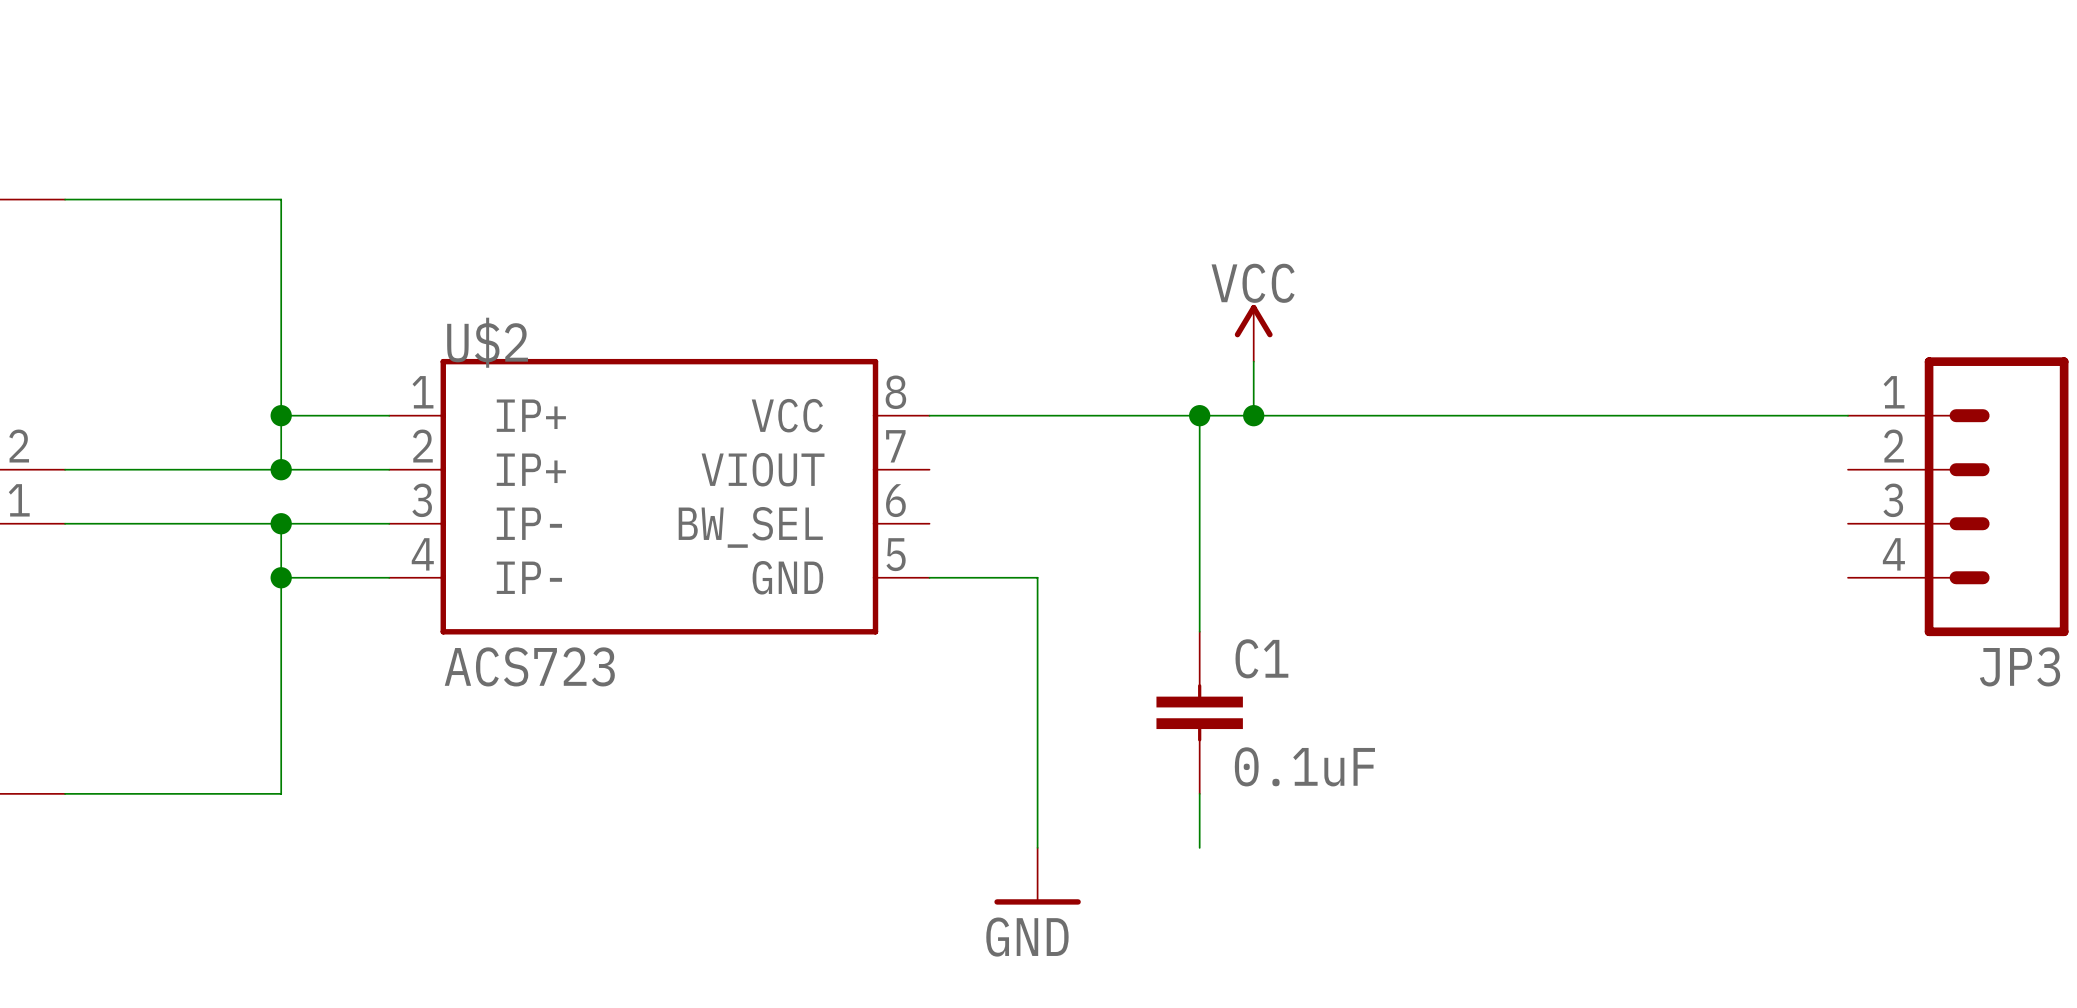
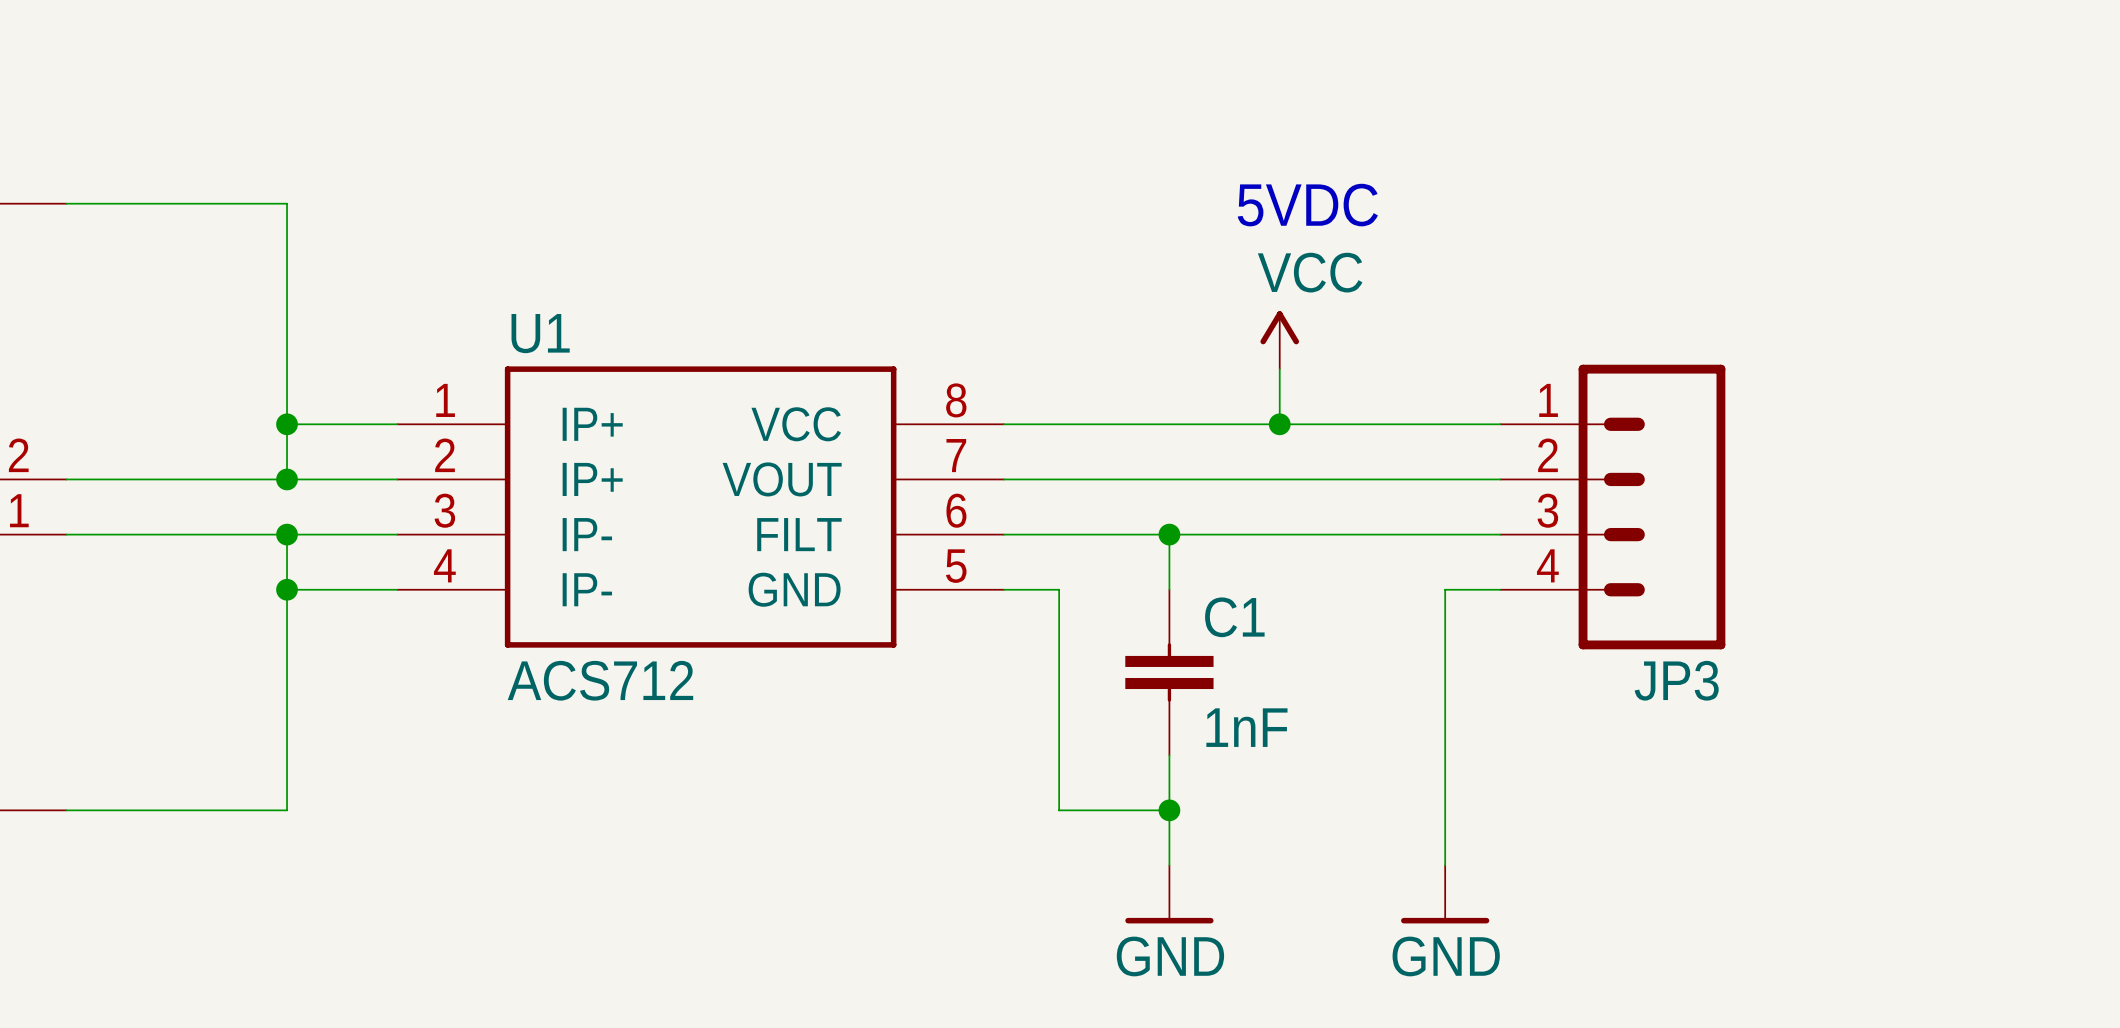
text: none -> 5VDC (1307, 205)
power symbol text position: VCC (1253, 283) -> VCC (1310, 272)
wire: (1199, 415) (1199, 631) -> none
junction position: (1199, 415) -> (1169, 534)
wire: (1469, 415) (1848, 415) -> none
wire: none -> (1003, 479) (1500, 479)
U$2: ACS723 (659, 496) -> none
U1: none -> ACS712 (700, 507)
JP3 position: (1958, 496) -> (1612, 507)
wire: none -> (1003, 534) (1500, 534)
wire: none -> (1500, 589) (1445, 589) (1445, 865)
C1 position: (1199, 712) -> (1169, 672)
wire: none -> (1169, 755) (1169, 865)
C1 value: 0.1uF (1304, 766) -> 1nF (1246, 727)
wire: (1037, 793) (1037, 847) -> (1059, 810) (1169, 810)
junction: none -> (1169, 810)
wire: (1199, 793) (1199, 847) -> (1169, 534) (1169, 589)
power symbol position: GND (1037, 876) -> GND (1169, 894)
power symbol: none -> GND (1445, 894)

